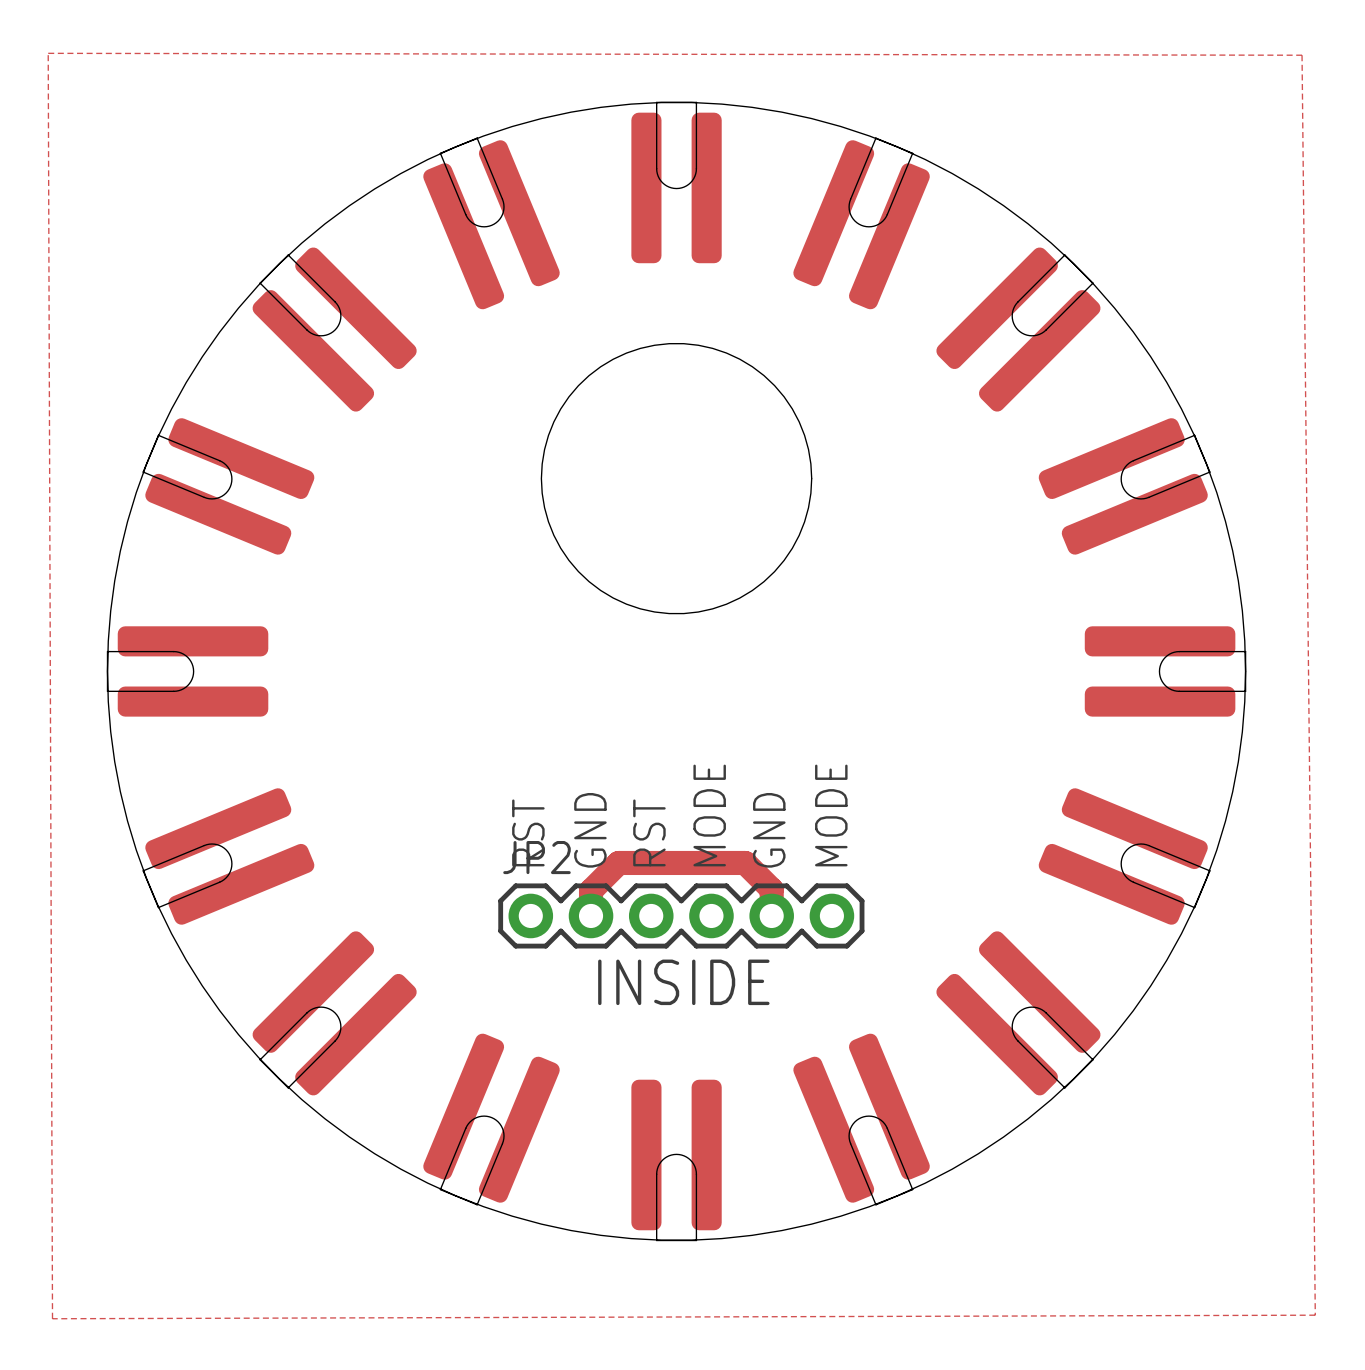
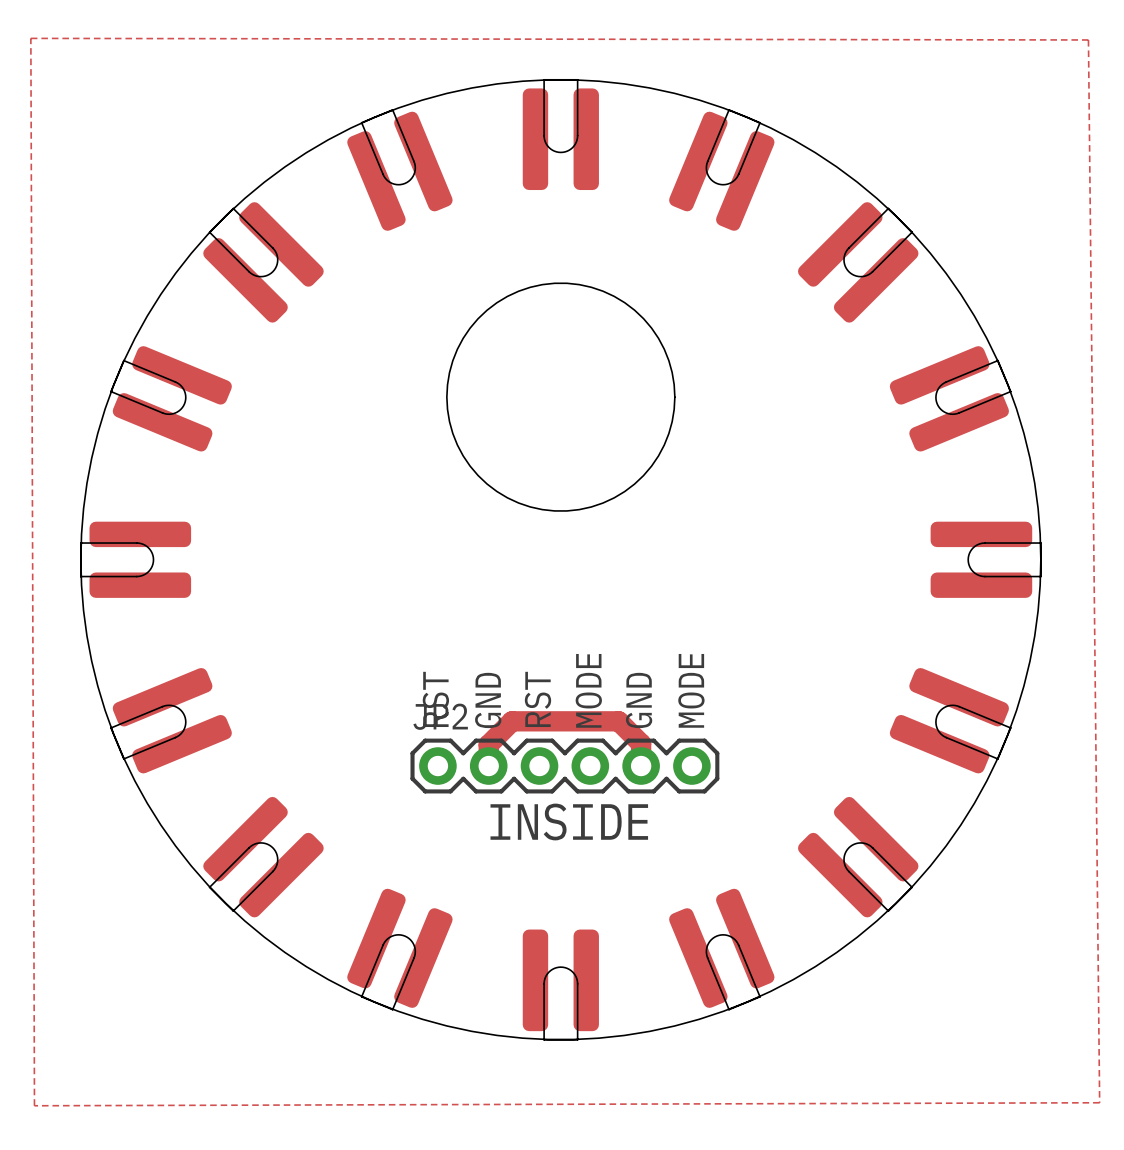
part footprint: [631, 102, 722, 264] -> [522, 79, 599, 191]
part footprint: [423, 138, 560, 310] -> [347, 109, 453, 231]
part footprint: [793, 138, 930, 310] -> [669, 109, 775, 231]
part footprint: [252, 247, 417, 412] -> [203, 202, 324, 323]
part footprint: [936, 247, 1101, 412] -> [798, 202, 919, 323]
part footprint: [143, 418, 315, 555] -> [110, 346, 232, 452]
part footprint: [1038, 418, 1210, 555] -> [889, 346, 1011, 452]
part footprint: [107, 626, 269, 717] -> [80, 521, 192, 598]
part footprint: [1084, 626, 1246, 717] -> [930, 521, 1041, 598]
part footprint: [143, 788, 315, 925] -> [110, 668, 232, 774]
part footprint: [1038, 788, 1210, 925] -> [889, 668, 1011, 774]
part footprint: [252, 931, 417, 1096] -> [203, 796, 324, 918]
part footprint: [936, 931, 1101, 1096] -> [798, 796, 919, 918]
part footprint: [423, 1033, 560, 1205] -> [347, 888, 453, 1010]
part footprint: [793, 1033, 930, 1205] -> [669, 888, 775, 1010]
part footprint: [631, 1079, 722, 1241] -> [522, 929, 599, 1040]

